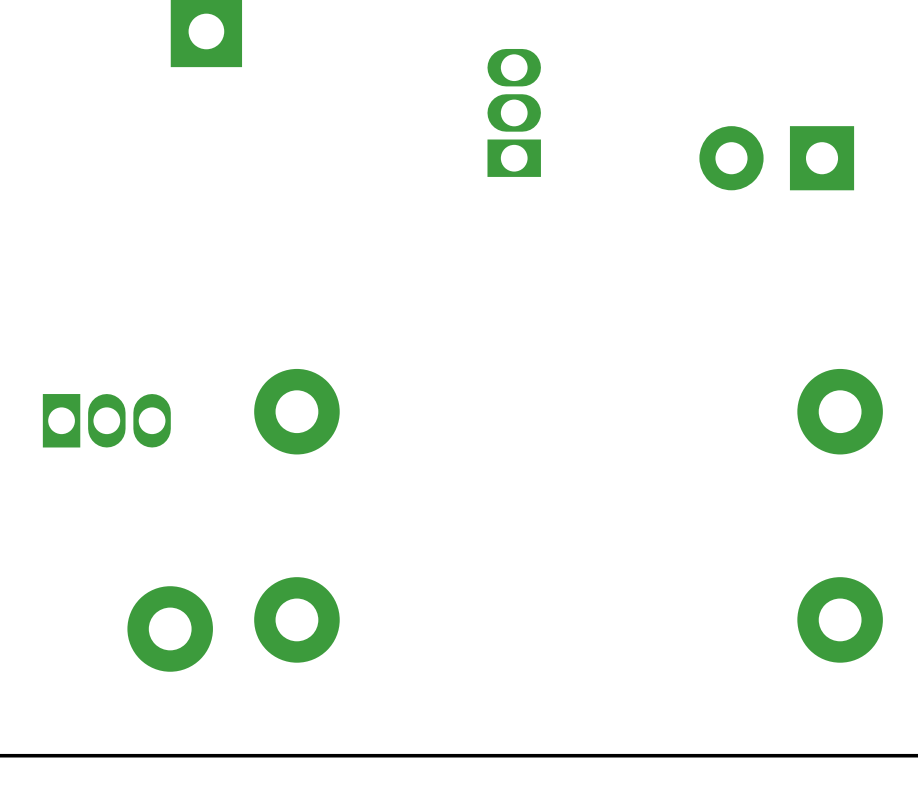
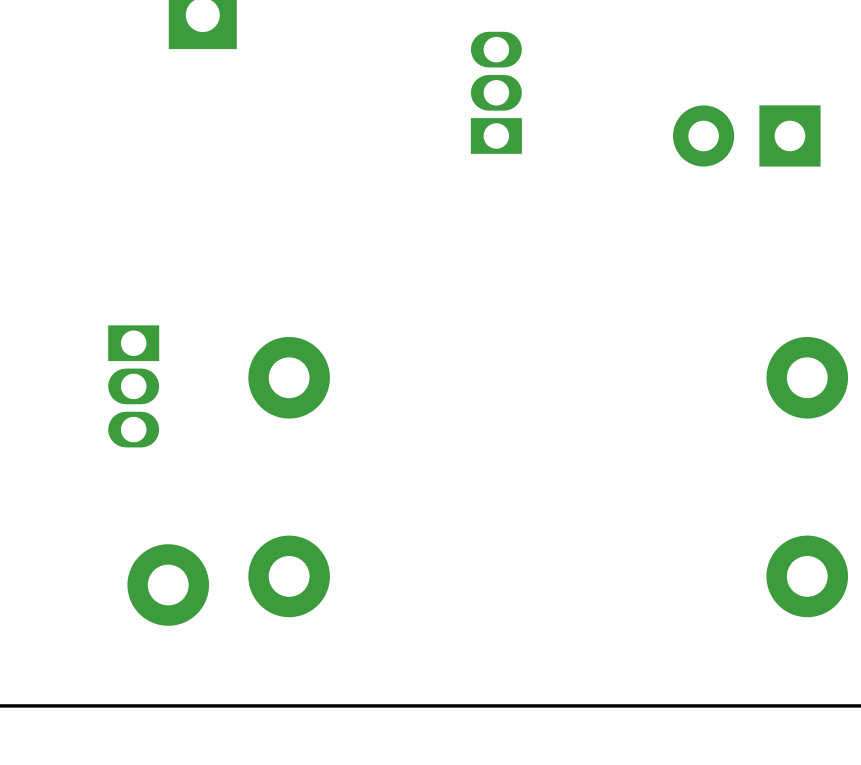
part rotation: 0° (106, 420) -> 90° clockwise (133, 386)

